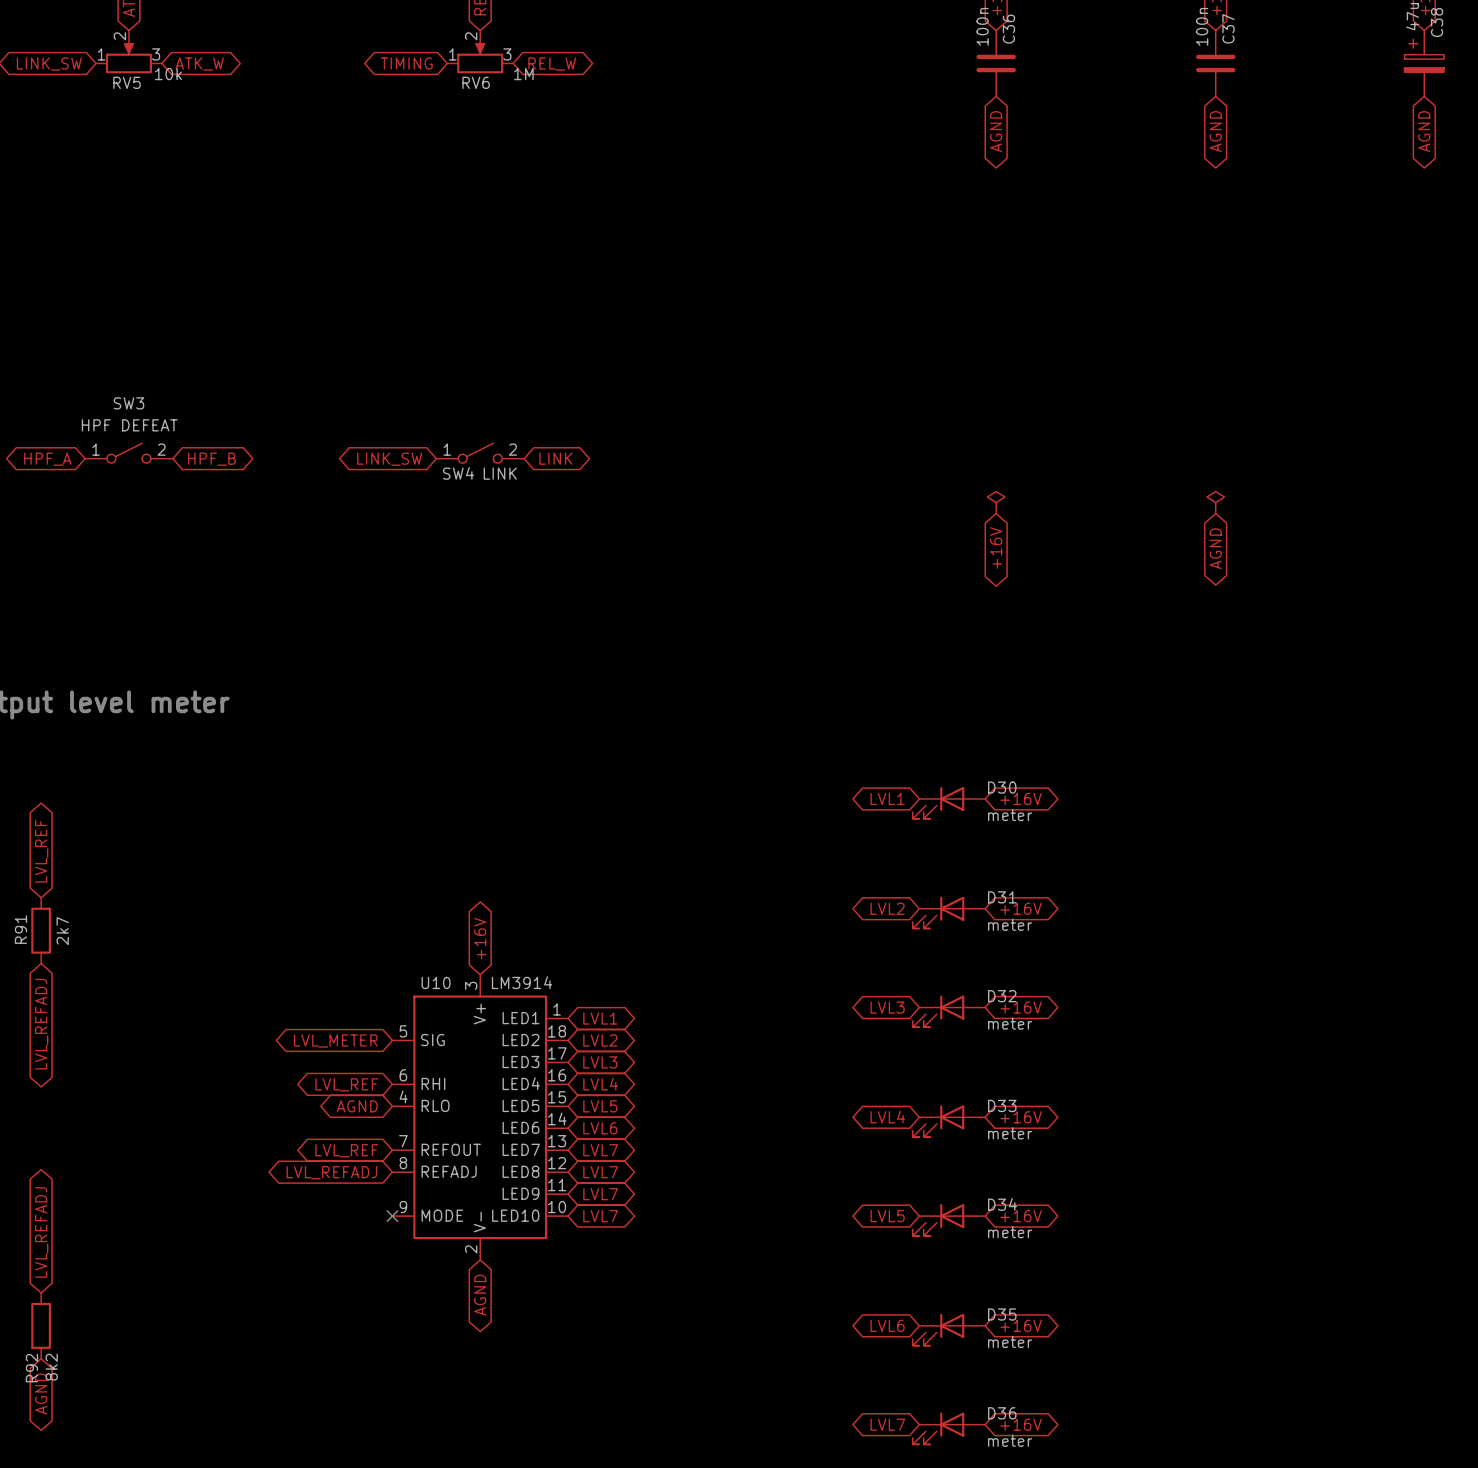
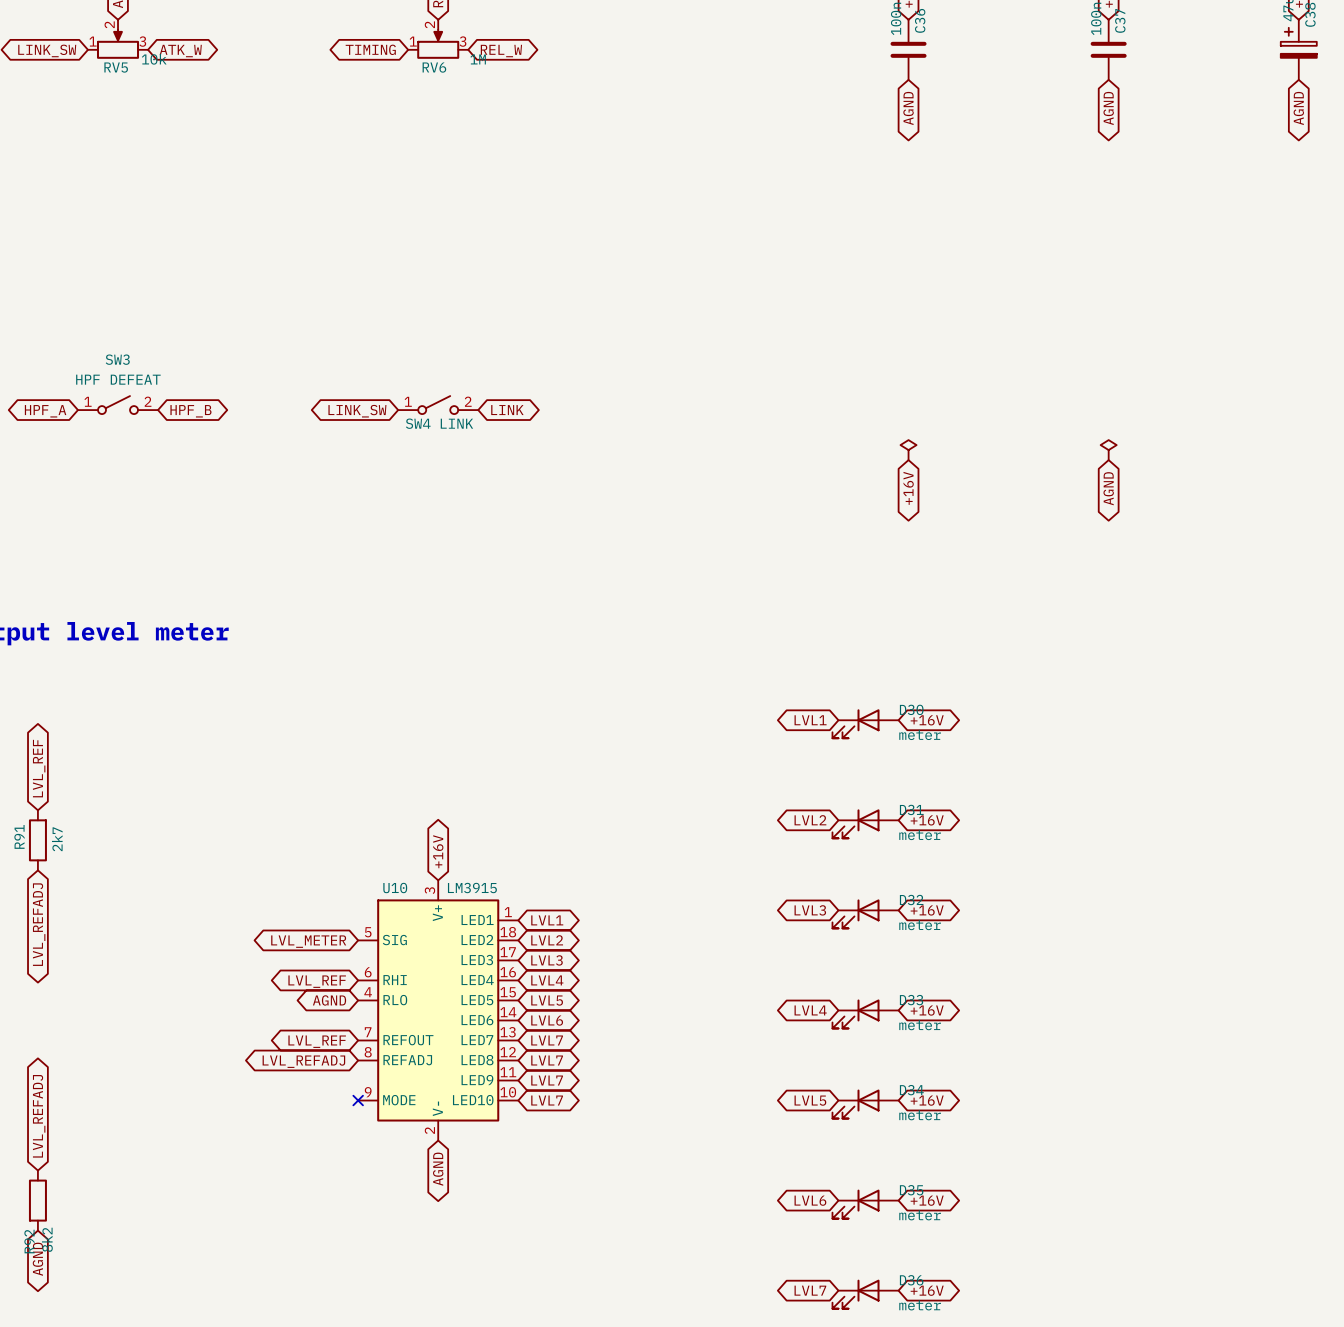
U10 value: LM3914 (522, 982) -> LM3915 (472, 888)

